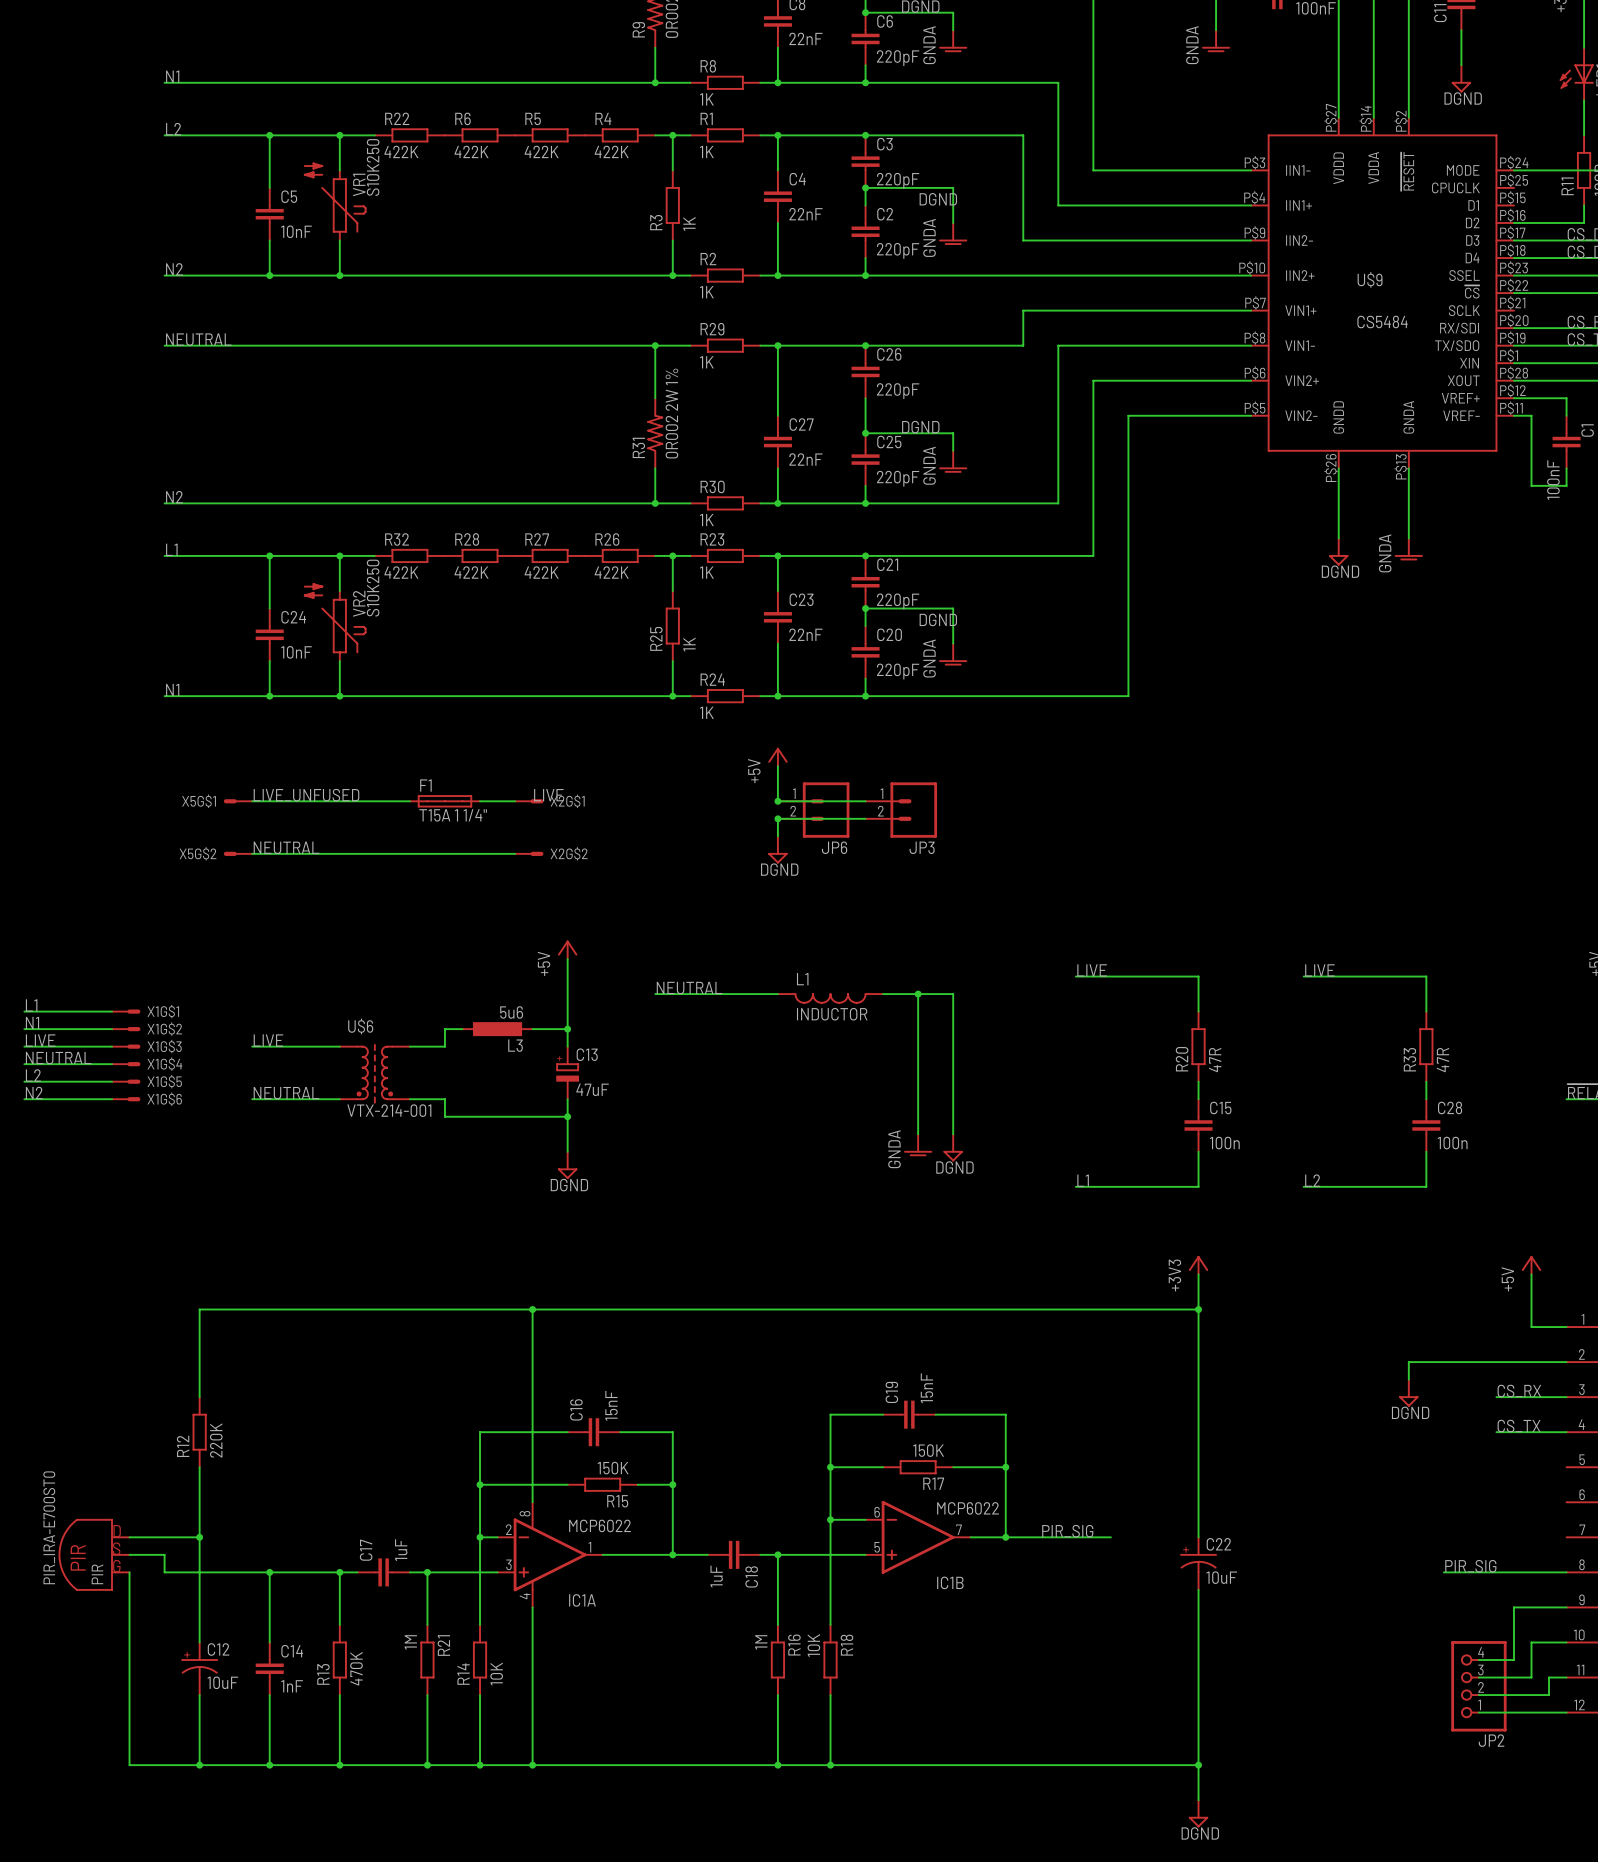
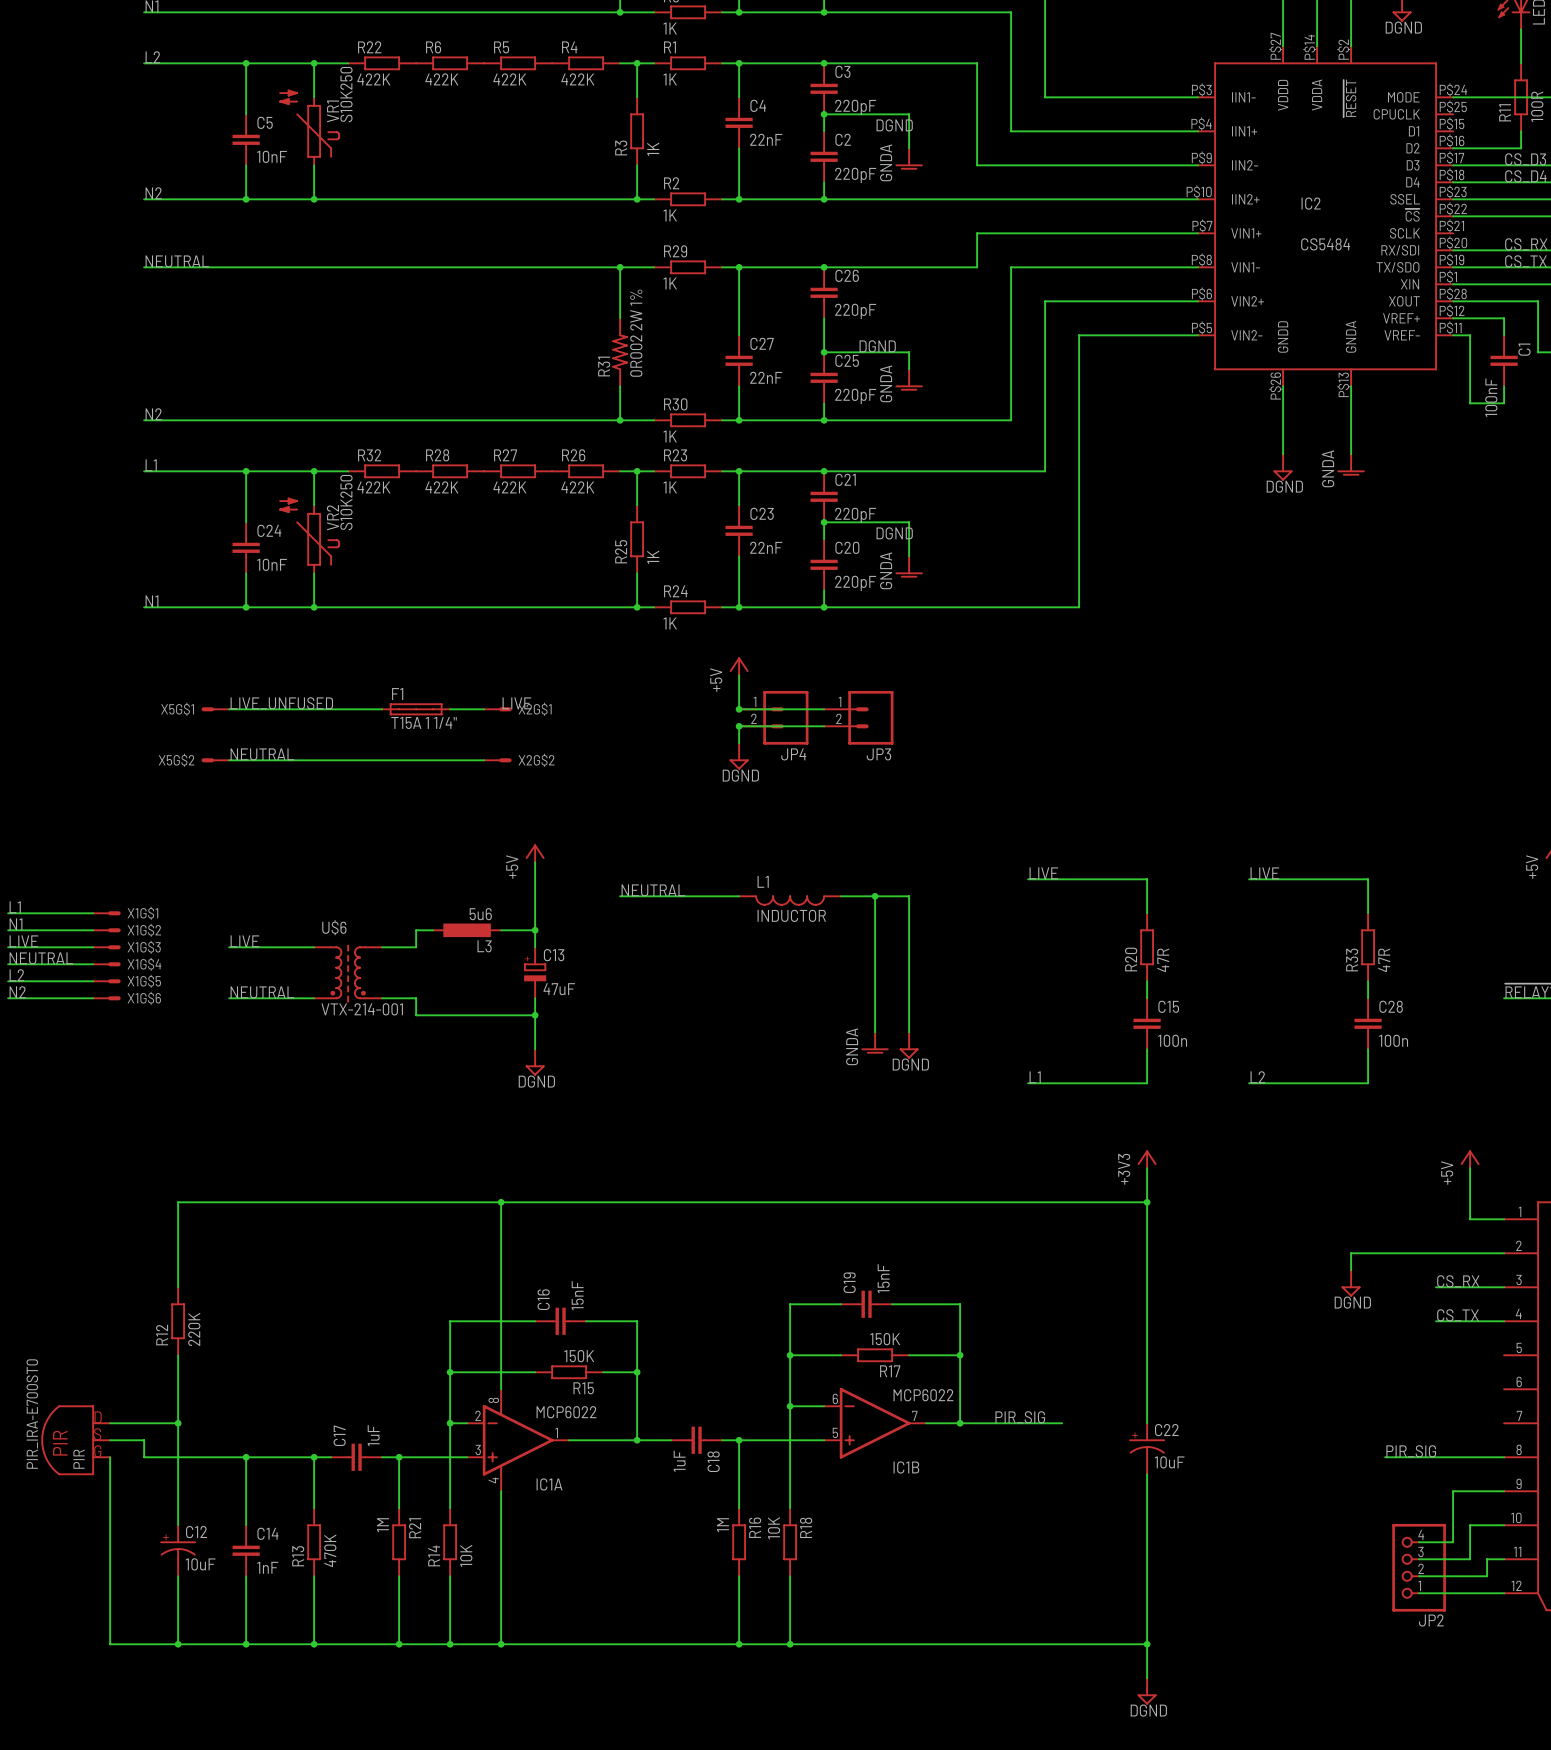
U$9 name: U$9 (1370, 279) -> IC2 (1311, 203)
JP6 name: JP6 (834, 847) -> JP4 (793, 754)

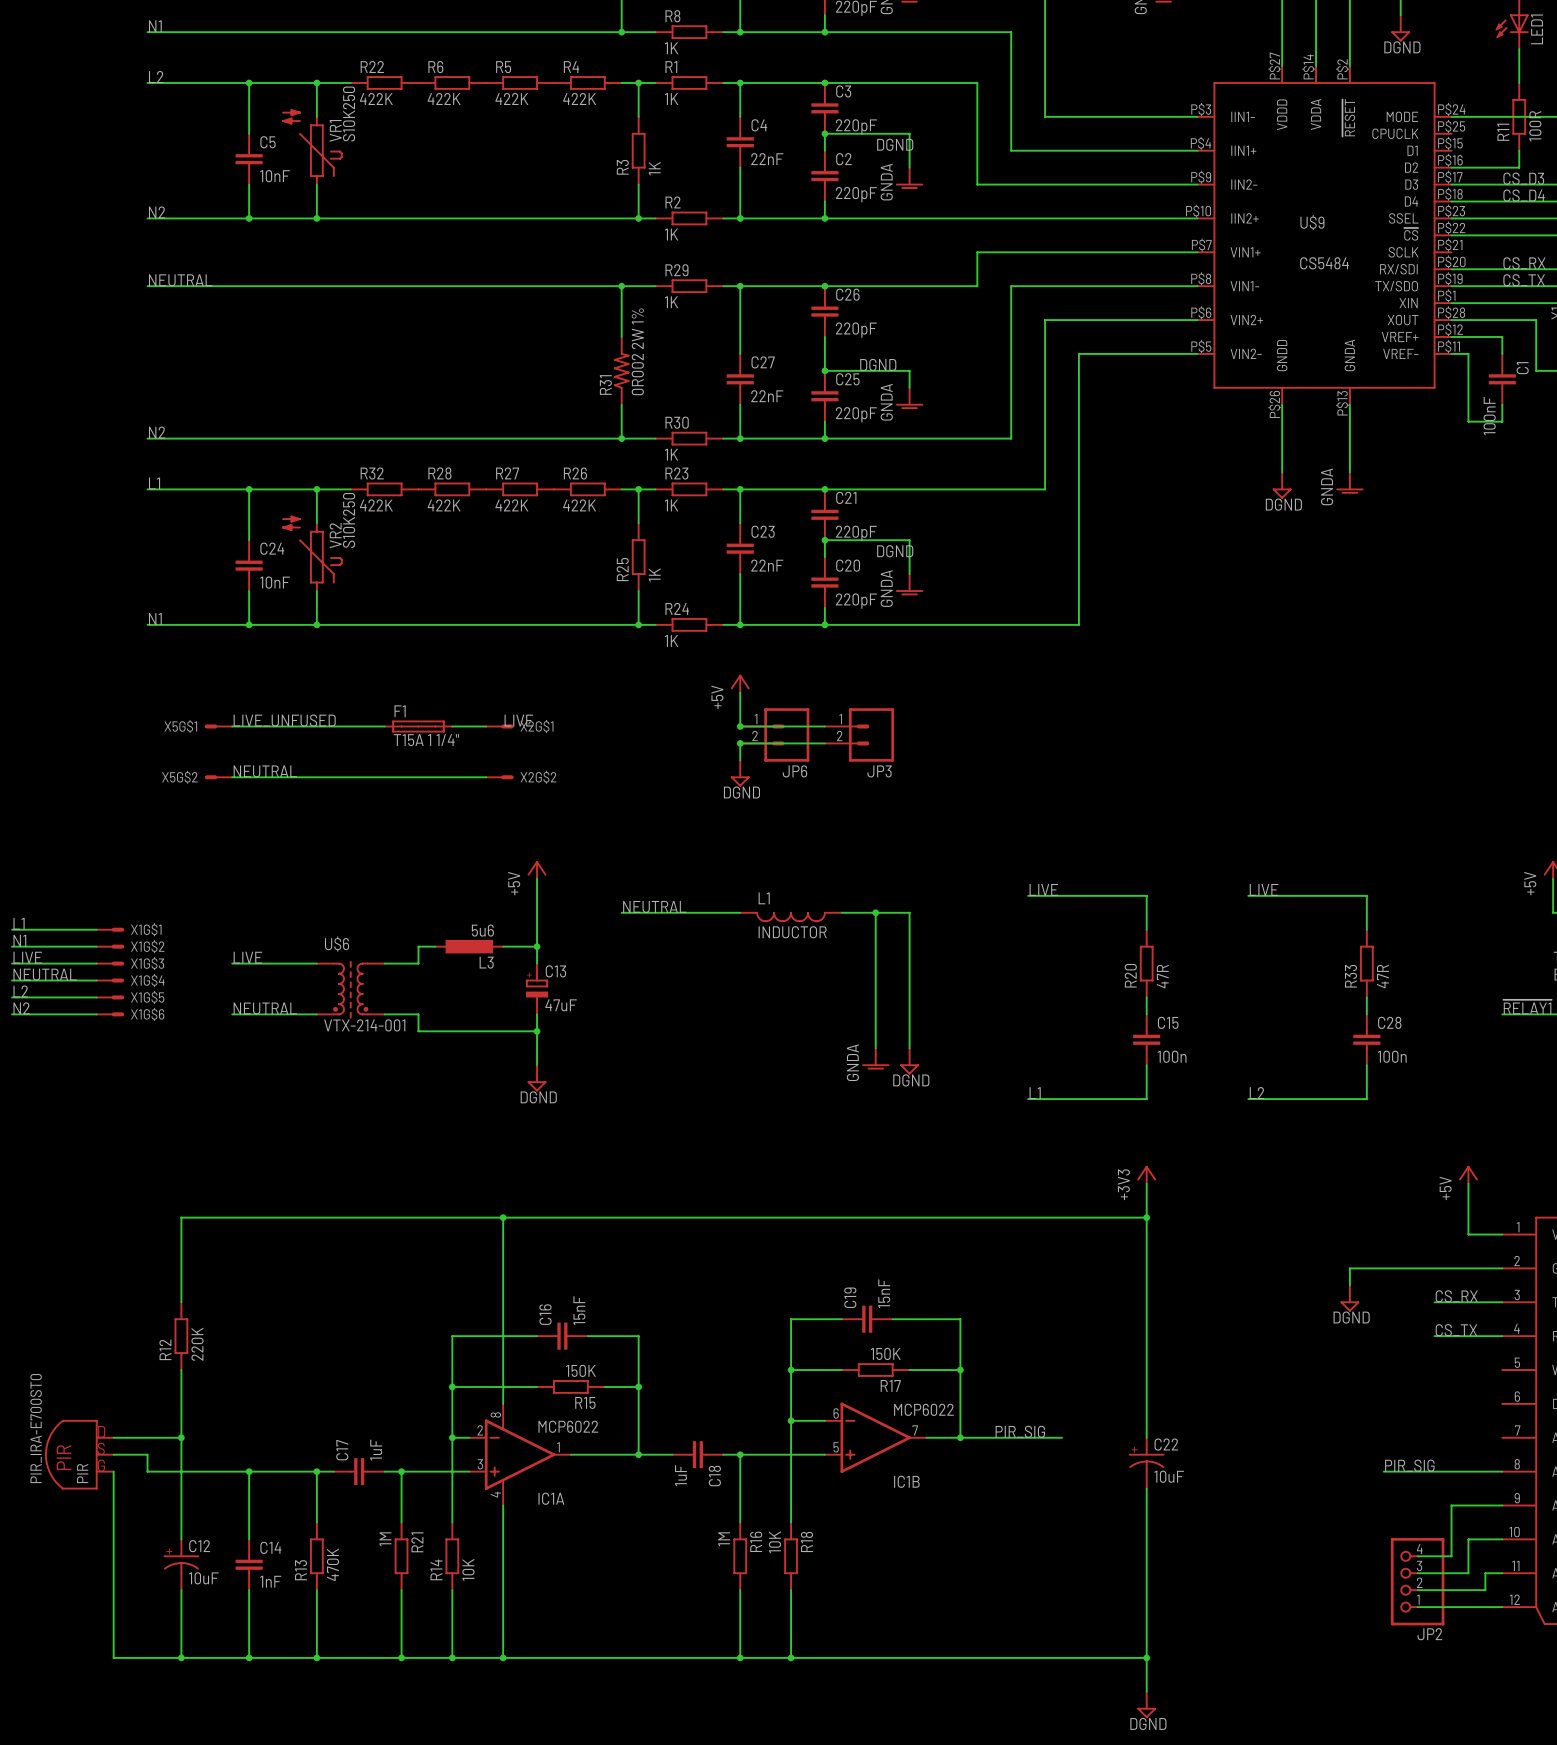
IC2 name: IC2 (1311, 203) -> U$9 (1312, 222)
JP4 name: JP4 (793, 754) -> JP6 (794, 771)

